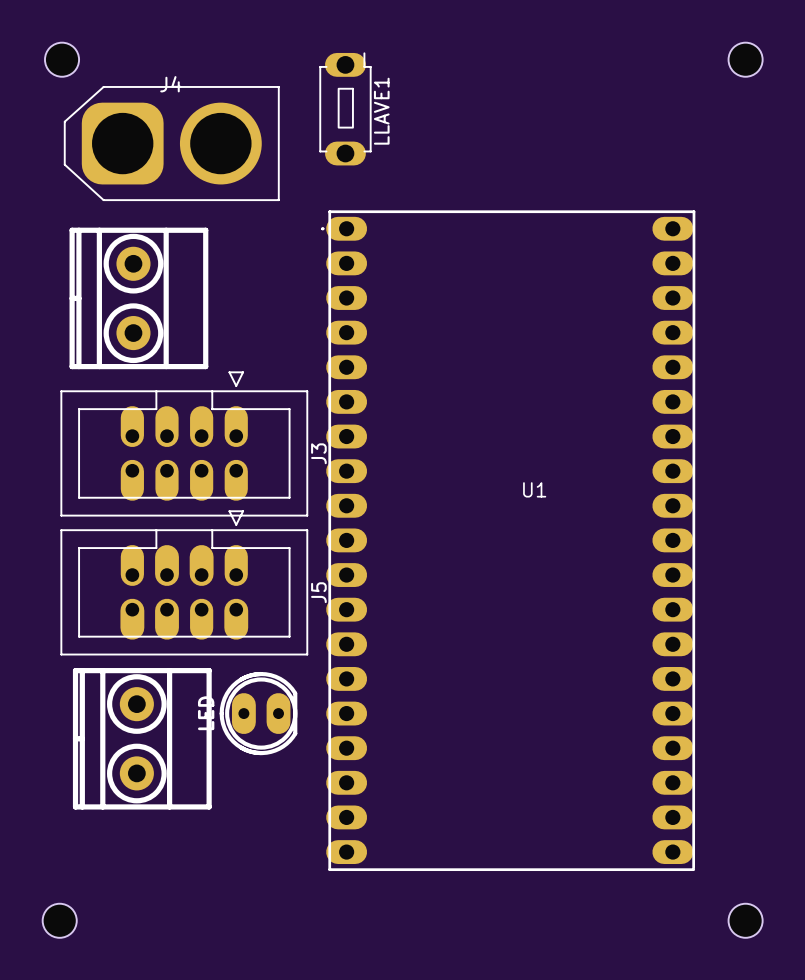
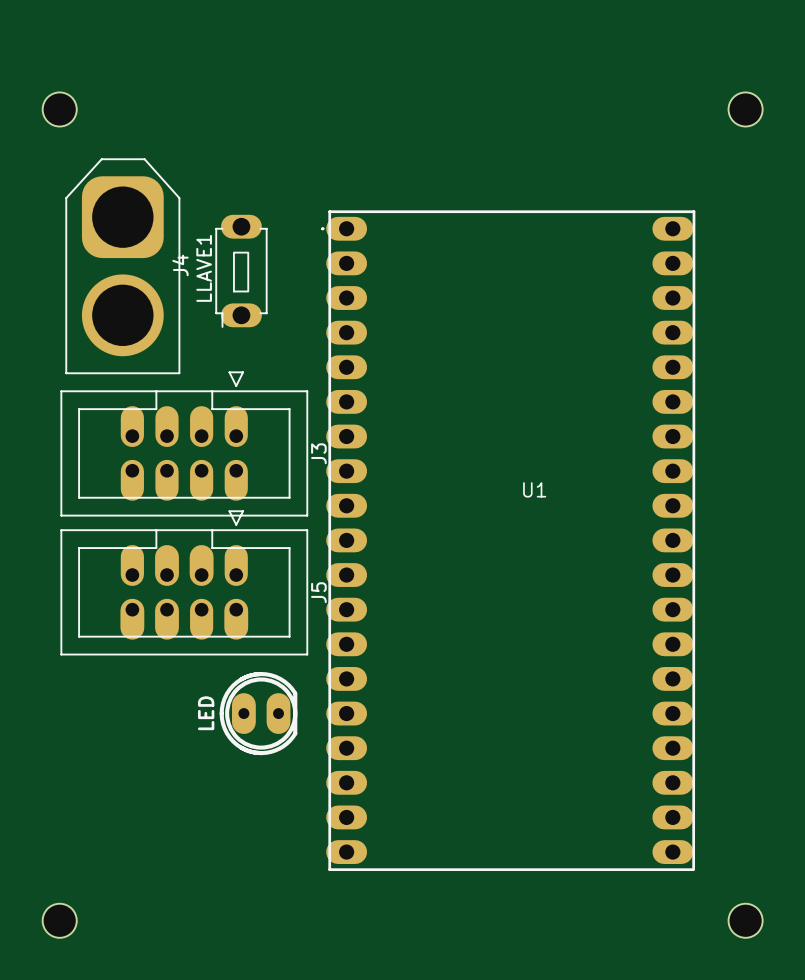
part position: (62, 59) -> (59, 109)
part position: (745, 59) -> (745, 109)
LLAVE1 rotation: 0° (345, 108) -> 180° (241, 271)
LLAVE1 position: (345, 108) -> (241, 271)
J4 rotation: 0° (171, 143) -> 90° clockwise (122, 266)
J4 position: (171, 143) -> (122, 266)
part: (138, 298) -> none
part: (142, 738) -> none

